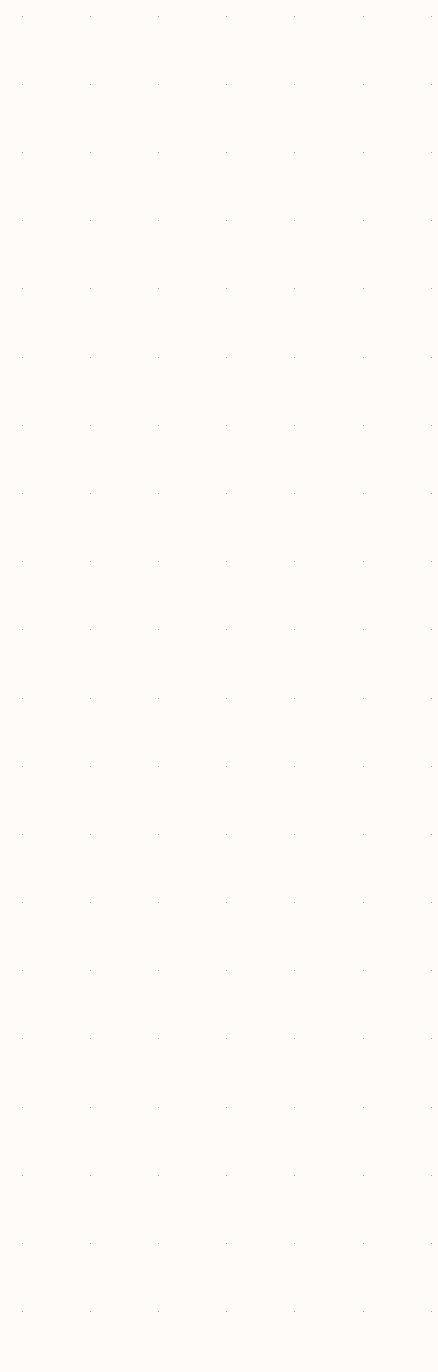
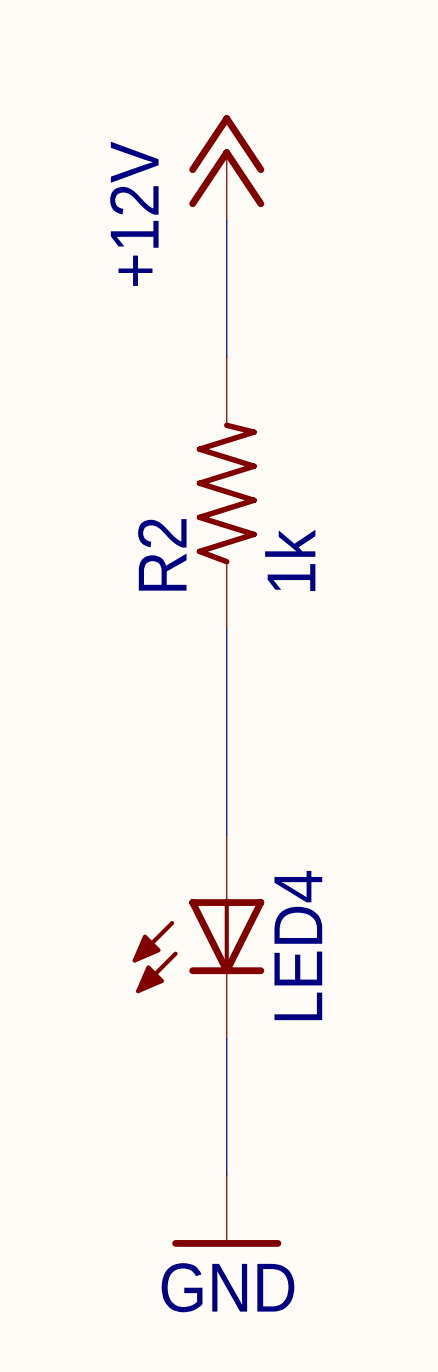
power symbol: none -> +12V (226, 167)
wire: none -> (226, 220) (226, 357)
R2: none -> 1k (226, 493)
wire: none -> (226, 629) (226, 834)
LED4: none -> (198, 936)
wire: none -> (226, 1038) (226, 1175)
power symbol: none -> GND (226, 1211)

